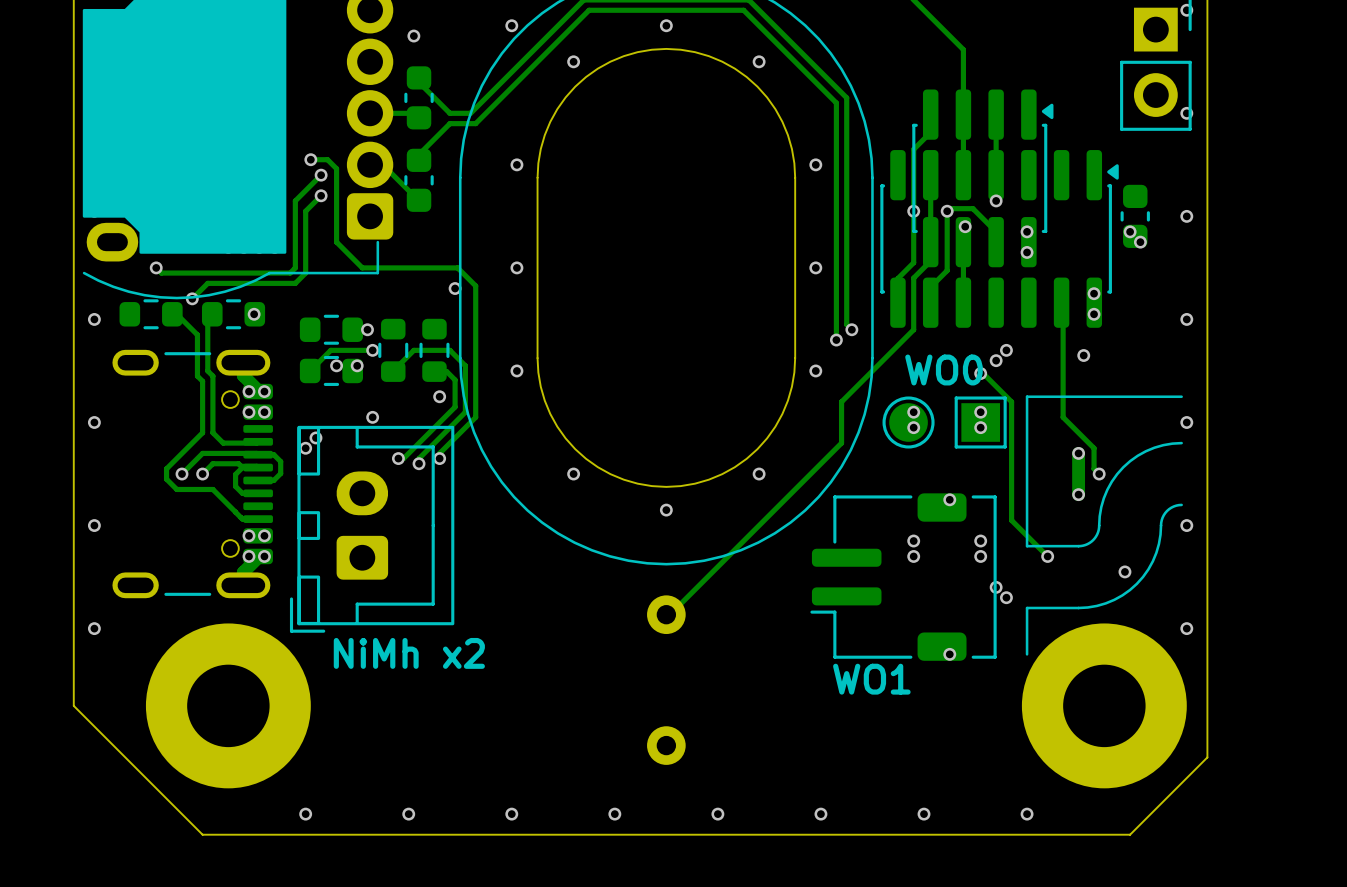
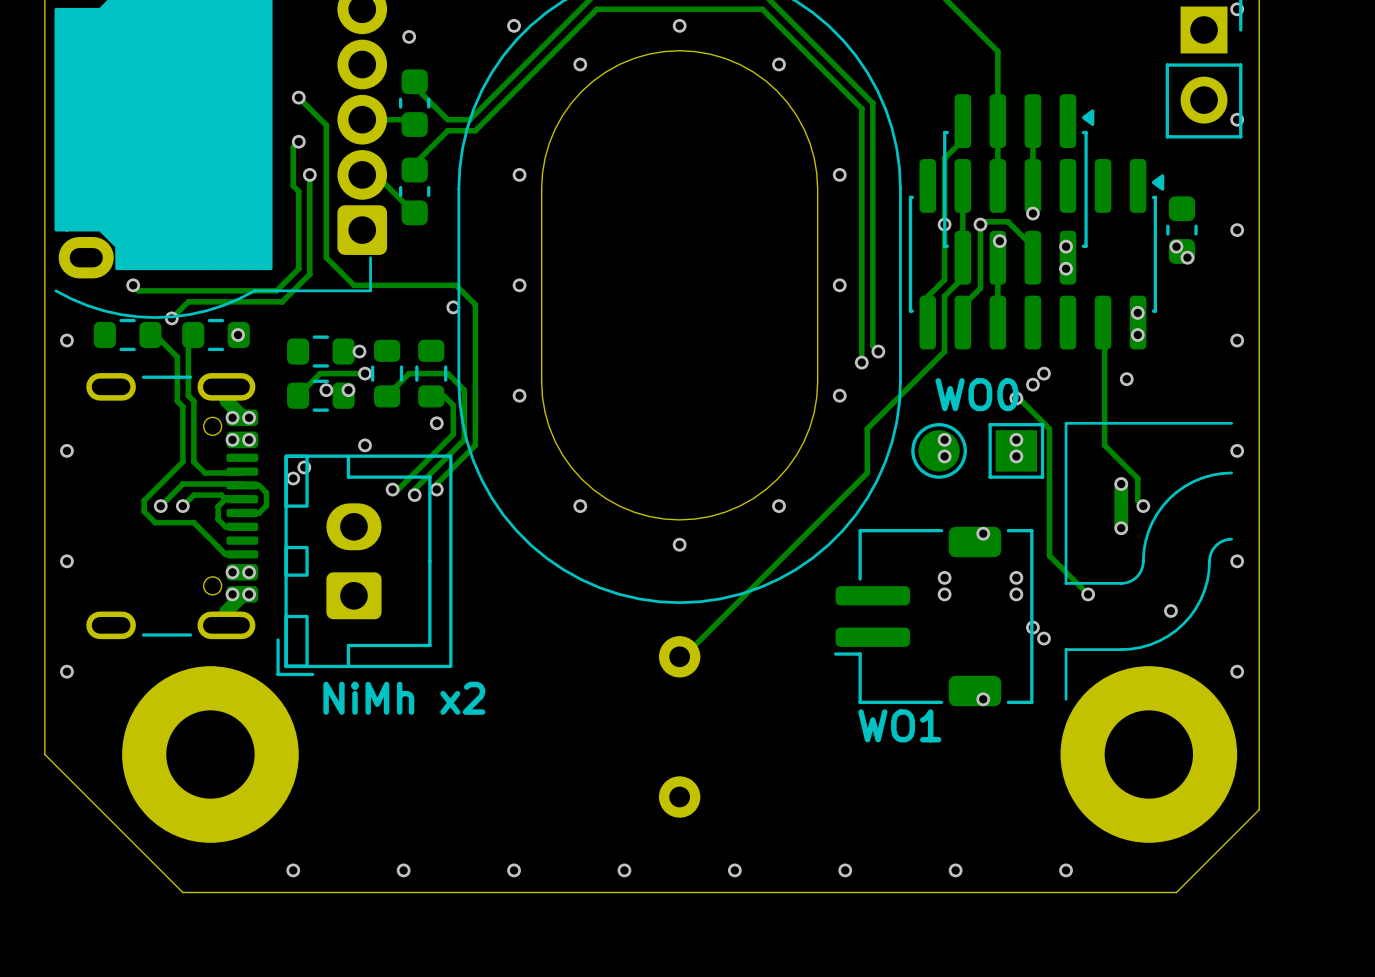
via: none -> (298, 97)
via: none -> (298, 141)
track: (310, 159) (327, 159) (336, 168) -> (298, 97) (326, 125) (326, 179)
via: (310, 159) -> none
via: none -> (309, 174)
track: (321, 175) (295, 200) (295, 267) -> (298, 141) (293, 147) (293, 185) (298, 191) (298, 268) (282, 285)
via: (321, 175) -> none
track: (321, 195) (305, 211) (305, 273) -> (309, 174) (309, 274) (293, 290)
via: (321, 195) -> none

